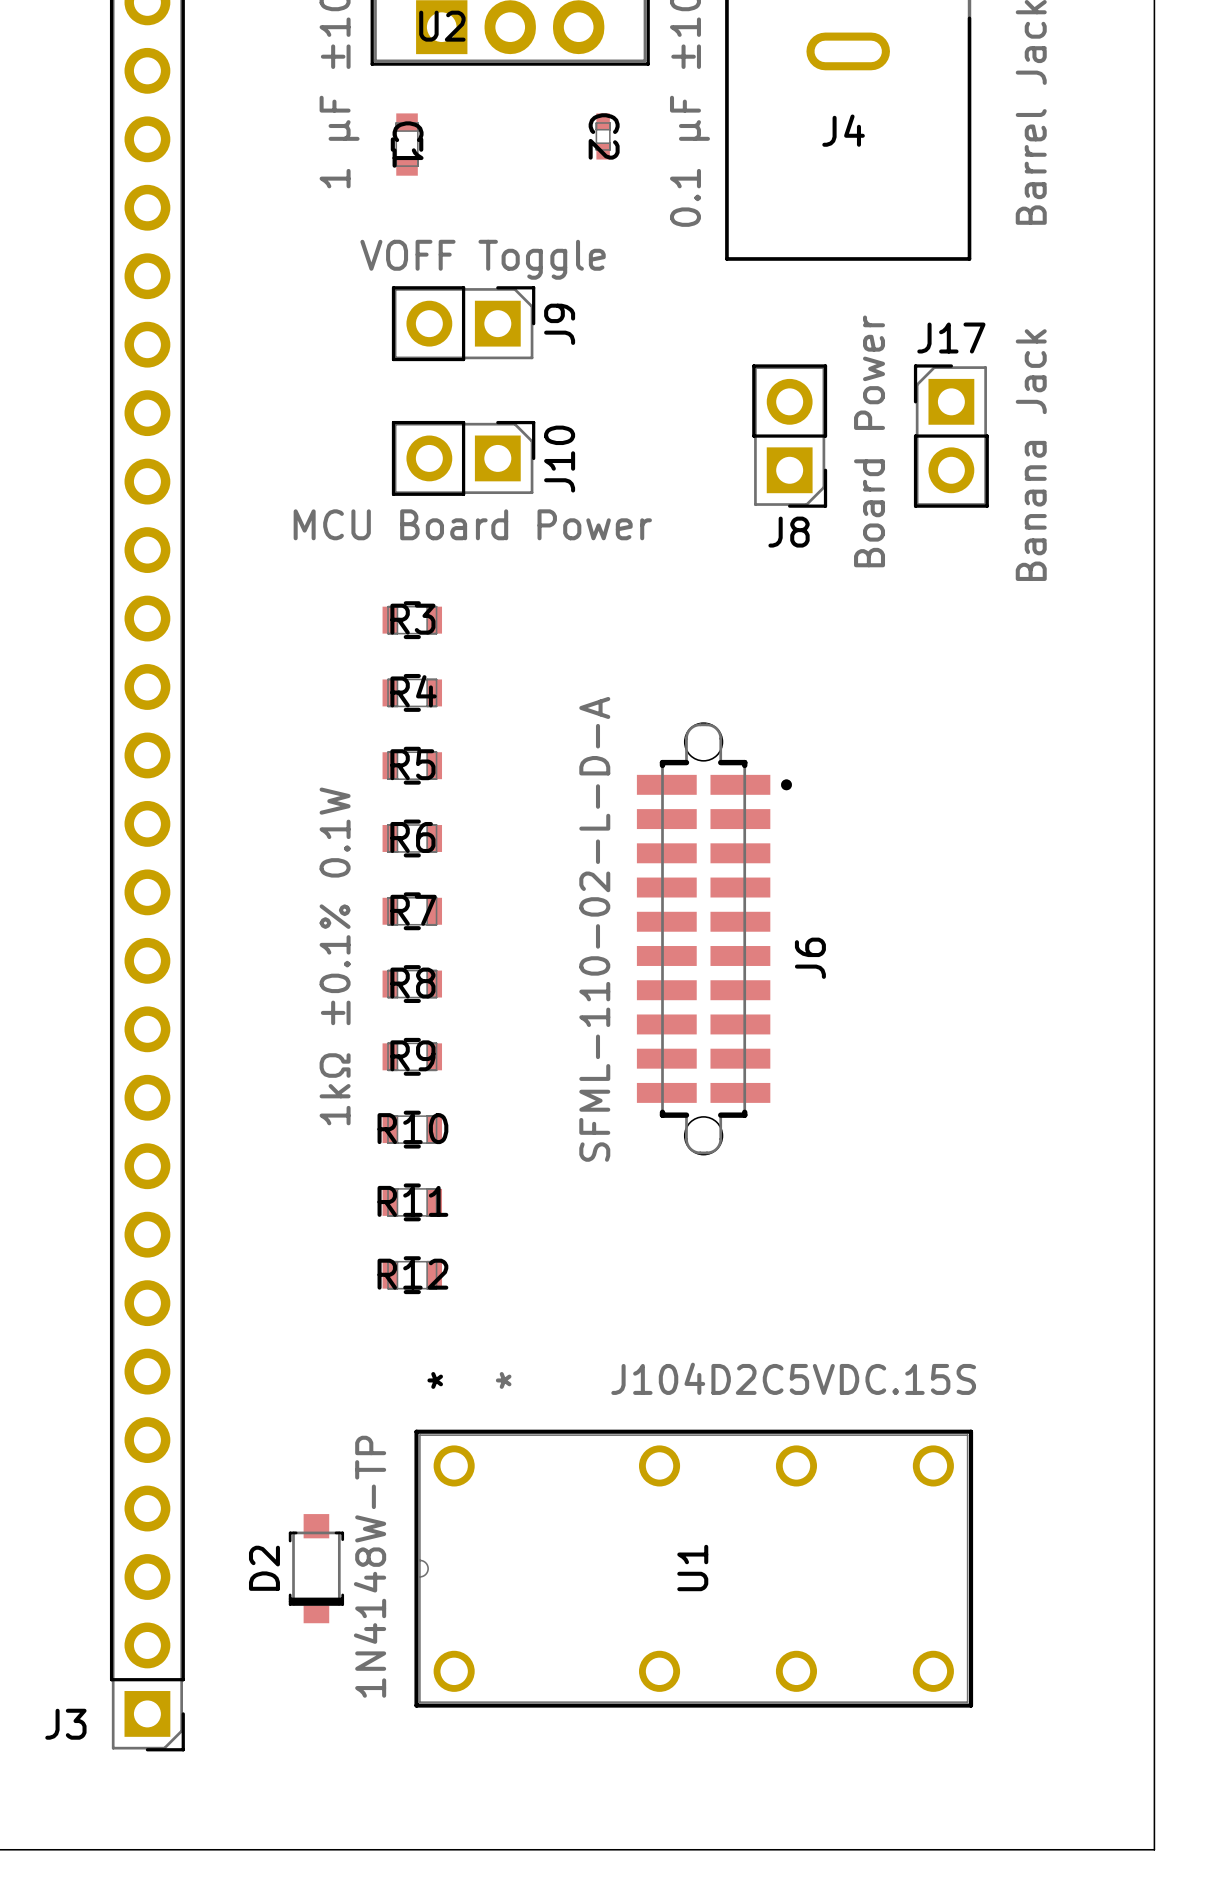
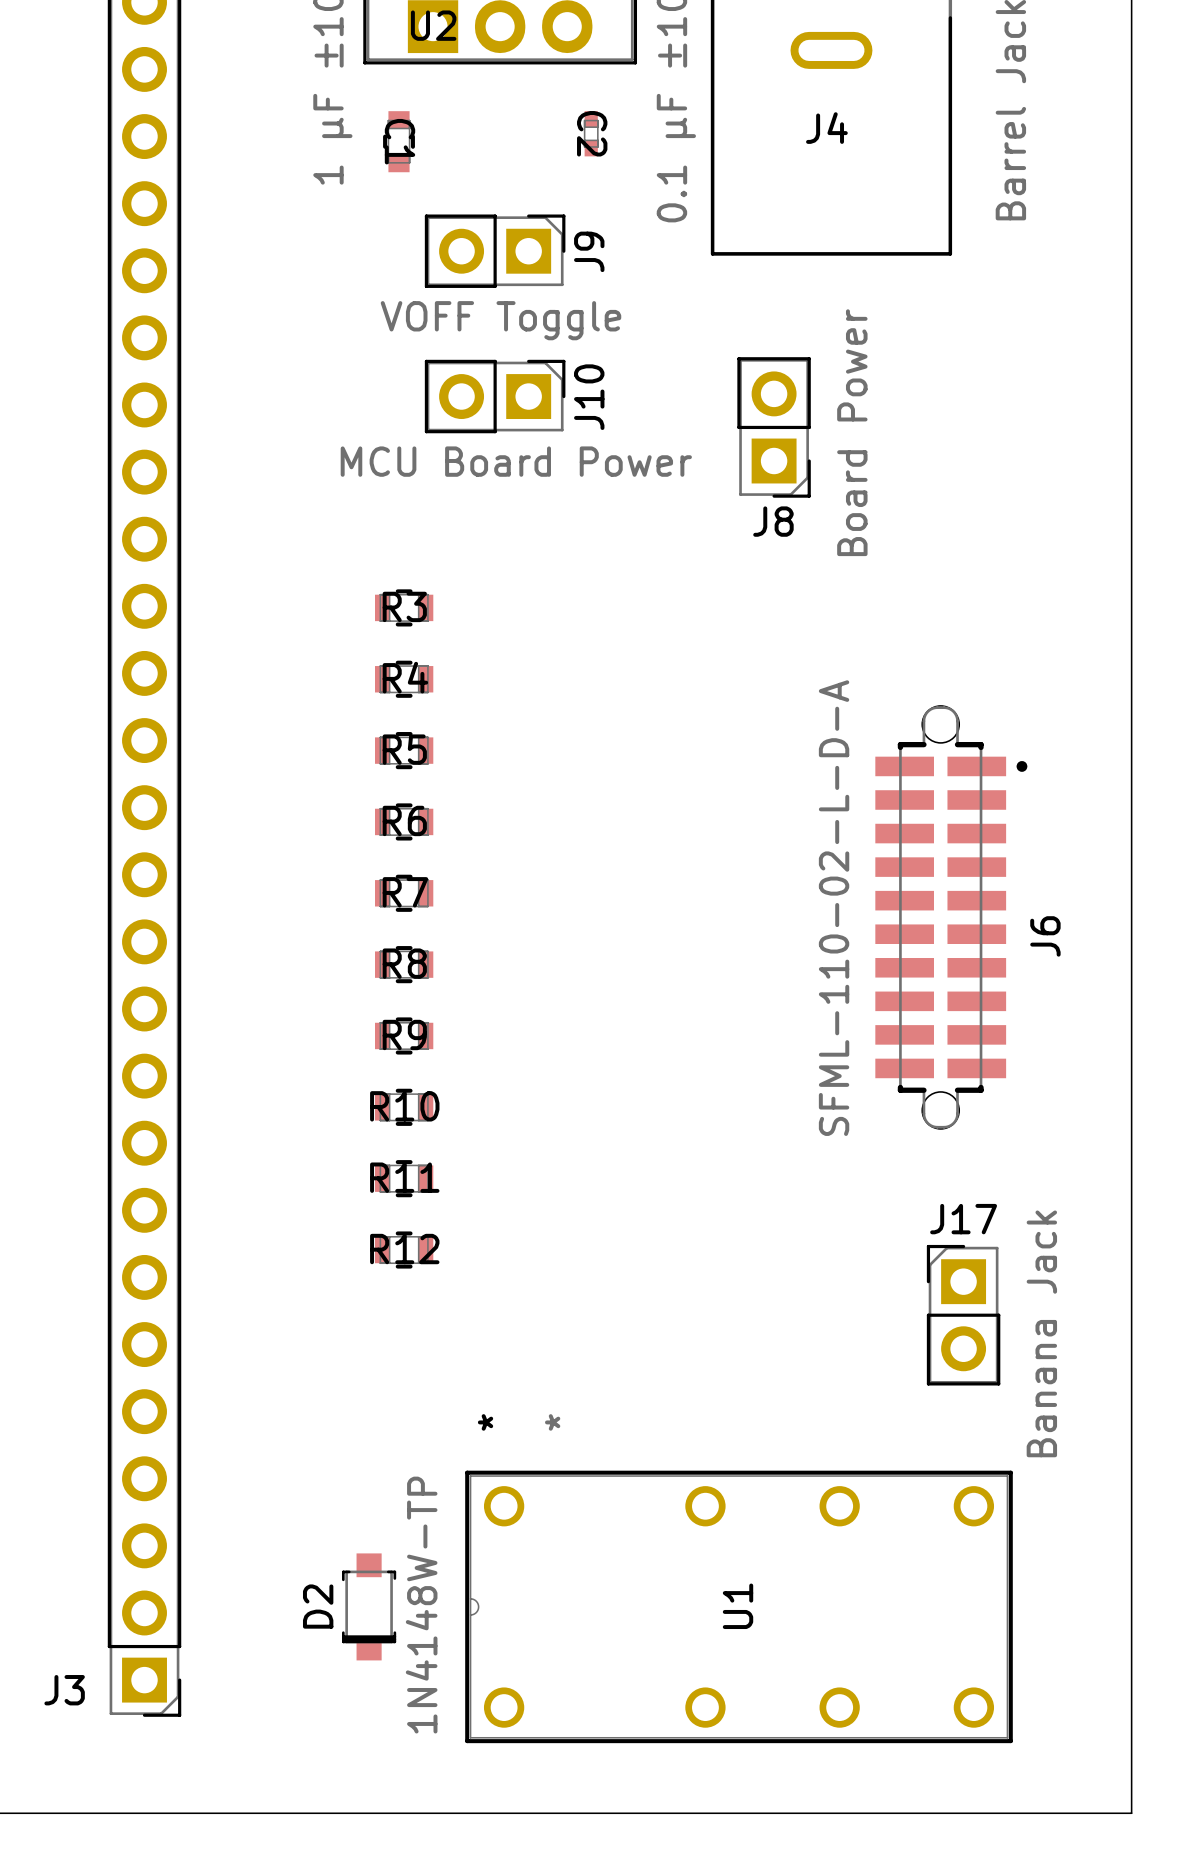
J9 value position: VOFF Toggle (483, 259) -> VOFF Toggle (501, 320)
J9 position: (463, 323) -> (495, 251)
J17 position: (951, 436) -> (963, 1315)
J10 position: (463, 458) -> (495, 396)
J10 value position: MCU Board Power (472, 524) -> MCU Board Power (516, 461)
J6 position: (714, 938) -> (951, 917)
R7 value: 1kΩ ±0.1% 0.1W (335, 956) -> none
U1 value: J104D2C5VDC.15S (793, 1378) -> none
D2 position: (316, 1568) -> (369, 1606)
U1 position: (693, 1568) -> (739, 1606)

